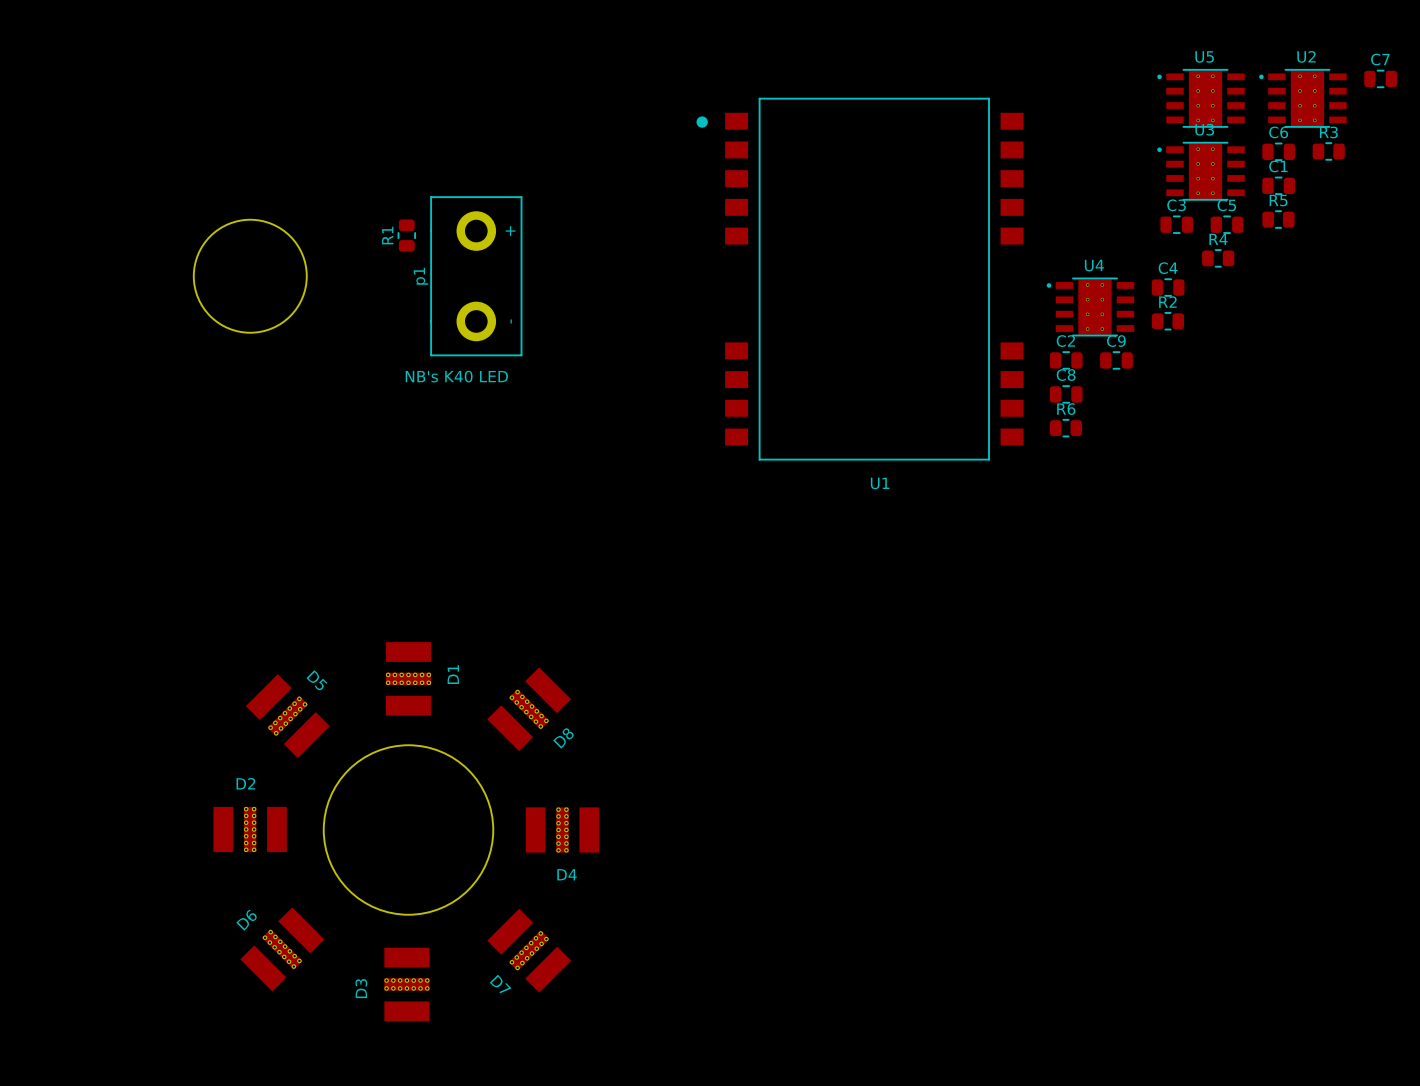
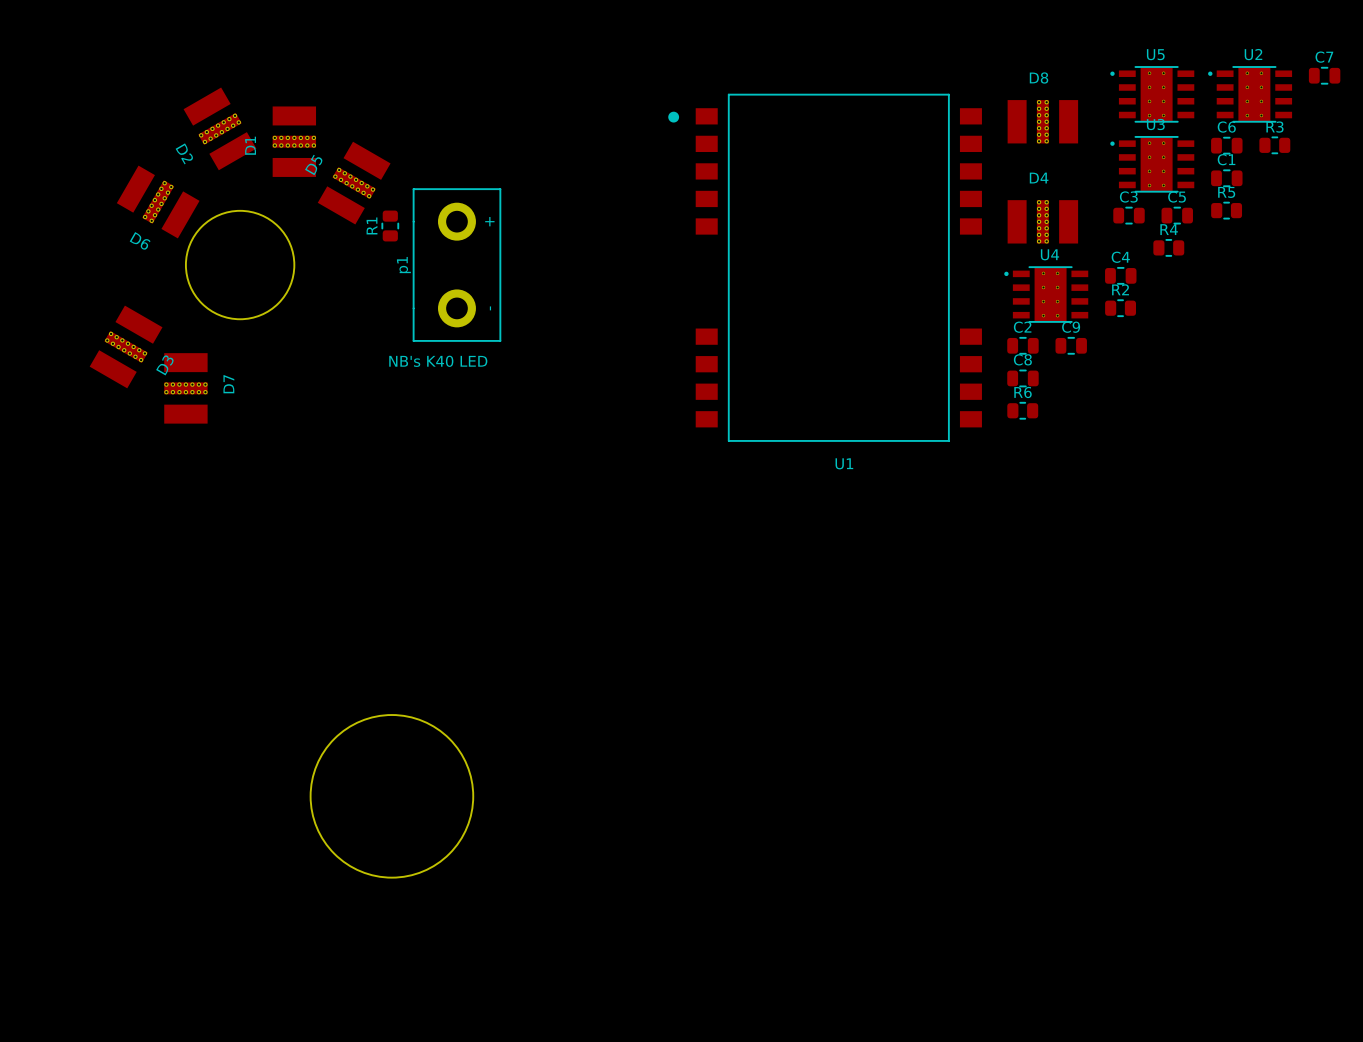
D1 name position: D1 (453, 674) -> D1 (250, 145)
D1 position: (408, 678) -> (294, 141)
D5 name position: D5 (316, 680) -> D5 (313, 165)
D8 rotation: 0° (529, 709) -> 45° clockwise (1042, 121)
D8 position: (529, 709) -> (1042, 121)
D5 rotation: 0° (287, 716) -> 75° clockwise (354, 183)
D5 position: (287, 716) -> (354, 183)
D8 name position: D8 (563, 738) -> D8 (1039, 77)
D2 name position: D2 (245, 783) -> D2 (184, 153)
D2 rotation: 0° (250, 829) -> 60° clockwise (219, 128)
D2 position: (250, 829) -> (219, 128)
D4 position: (562, 830) -> (1042, 221)
D4 name position: D4 (567, 874) -> D4 (1039, 178)
D6 name position: D6 (246, 920) -> D6 (140, 240)
D6 rotation: 0° (282, 949) -> 75° clockwise (158, 202)
D6 position: (282, 949) -> (158, 202)
D7 rotation: 0° (529, 950) -> 45° clockwise (185, 388)
D7 position: (529, 950) -> (185, 388)
D7 name position: D7 (500, 983) -> D7 (228, 384)
D3 rotation: 0° (406, 984) -> 30° clockwise (126, 346)
D3 position: (406, 984) -> (126, 346)
D3 name position: D3 (361, 988) -> D3 (164, 365)

